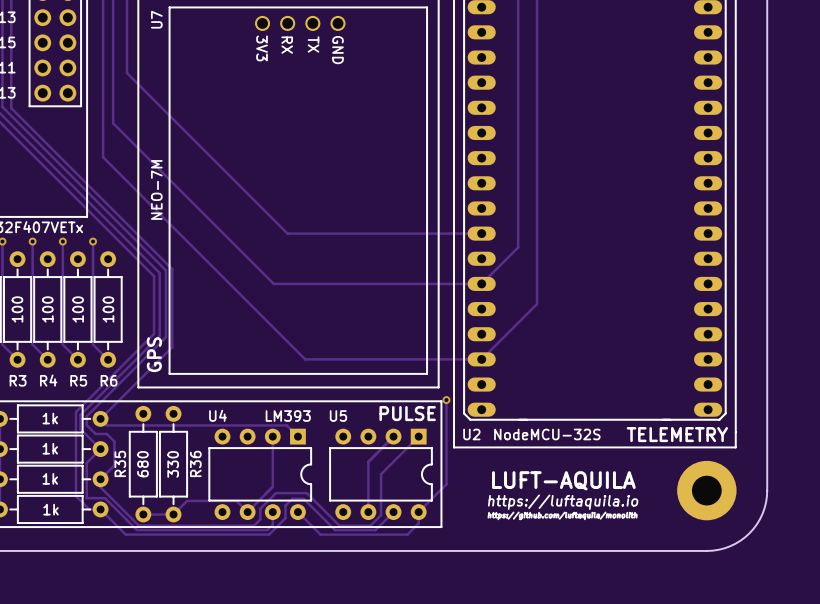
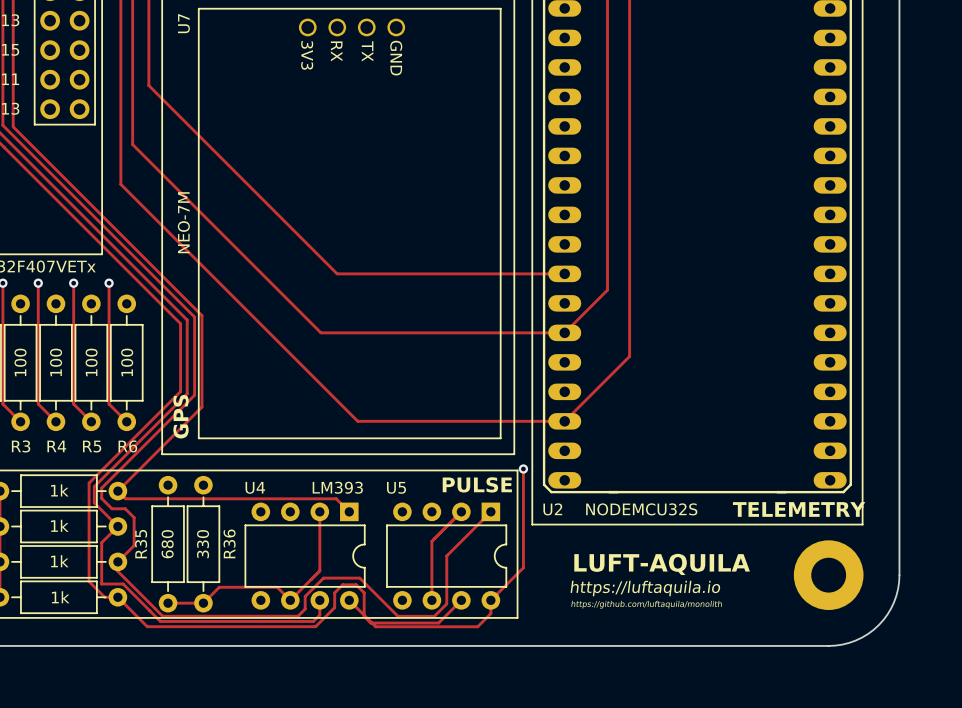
U2 value: NodeMCU-32S (547, 434) -> NODEMCU32S (641, 509)
track: (310, 505) (335, 530) (375, 530) -> (364, 592) (364, 616) (370, 623) (440, 621)

